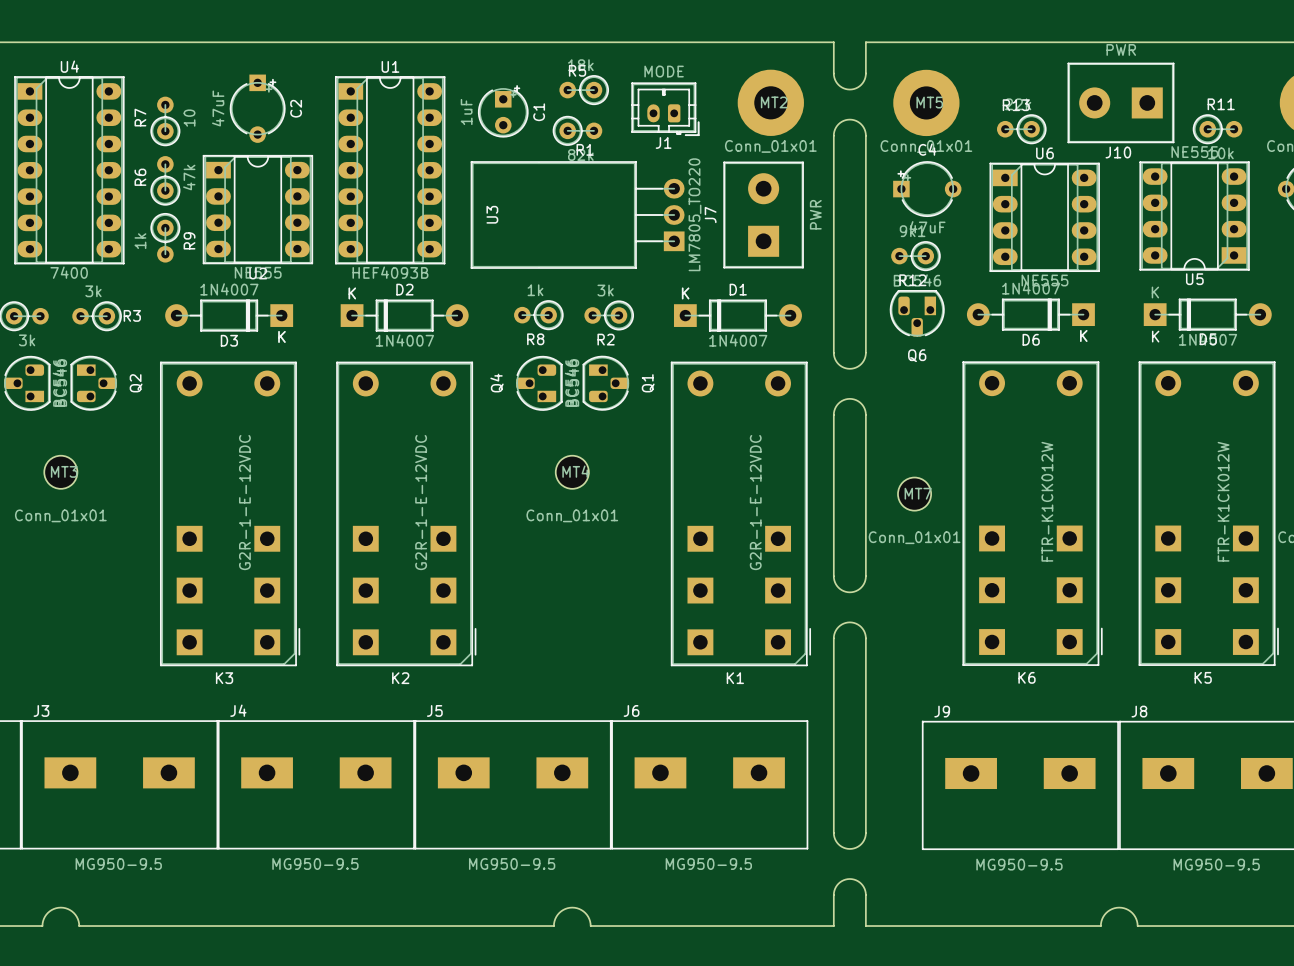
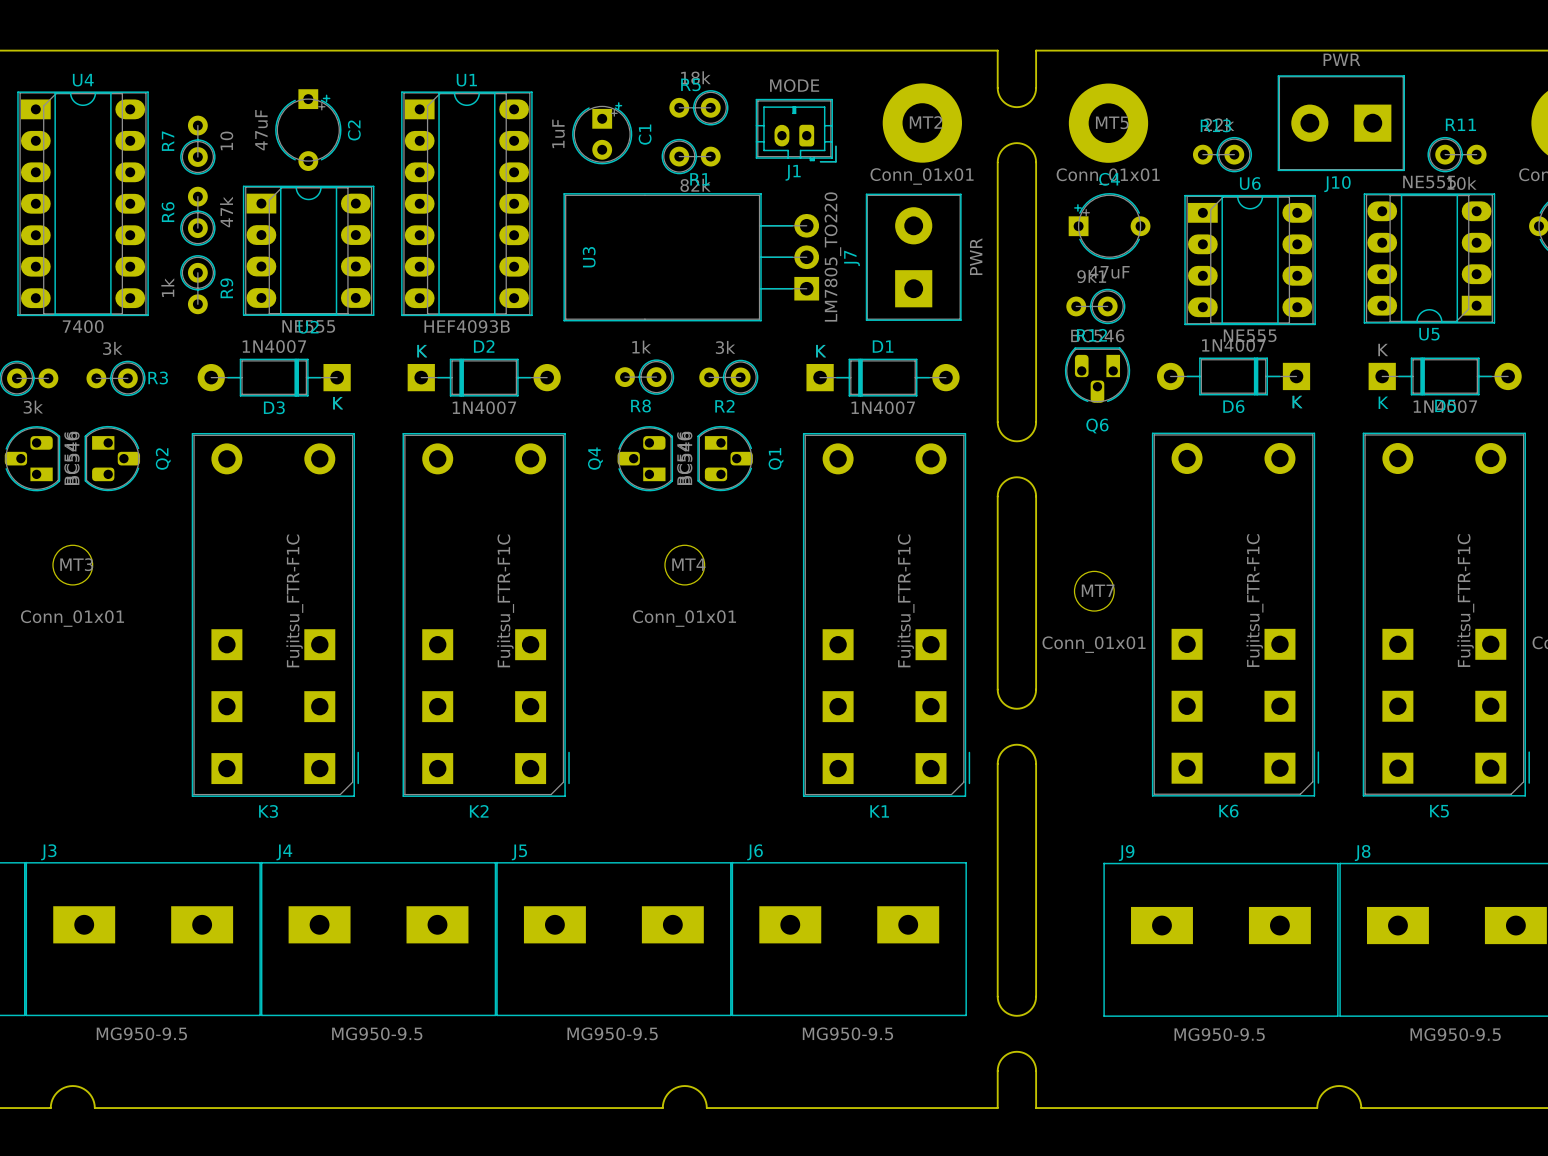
K6 value: FTR-K1CK012W (1047, 501) -> Fujitsu_FTR-F1C (1254, 600)
K5 value: FTR-K1CK012W (1223, 501) -> Fujitsu_FTR-F1C (1465, 600)
K3 value: G2R-1-E-12VDC (244, 502) -> Fujitsu_FTR-F1C (294, 600)
K2 value: G2R-1-E-12VDC (421, 502) -> Fujitsu_FTR-F1C (505, 600)
K1 value: G2R-1-E-12VDC (755, 502) -> Fujitsu_FTR-F1C (906, 600)

